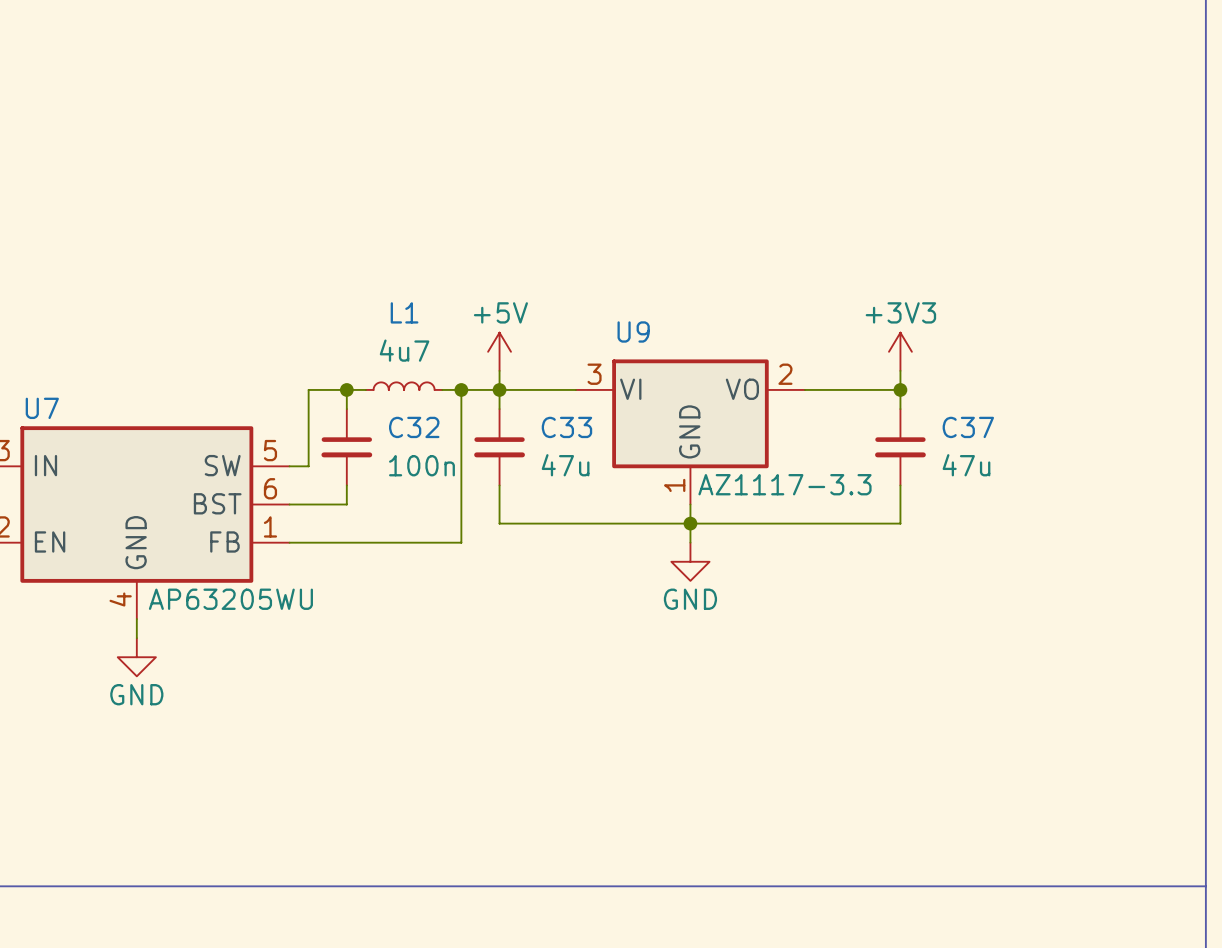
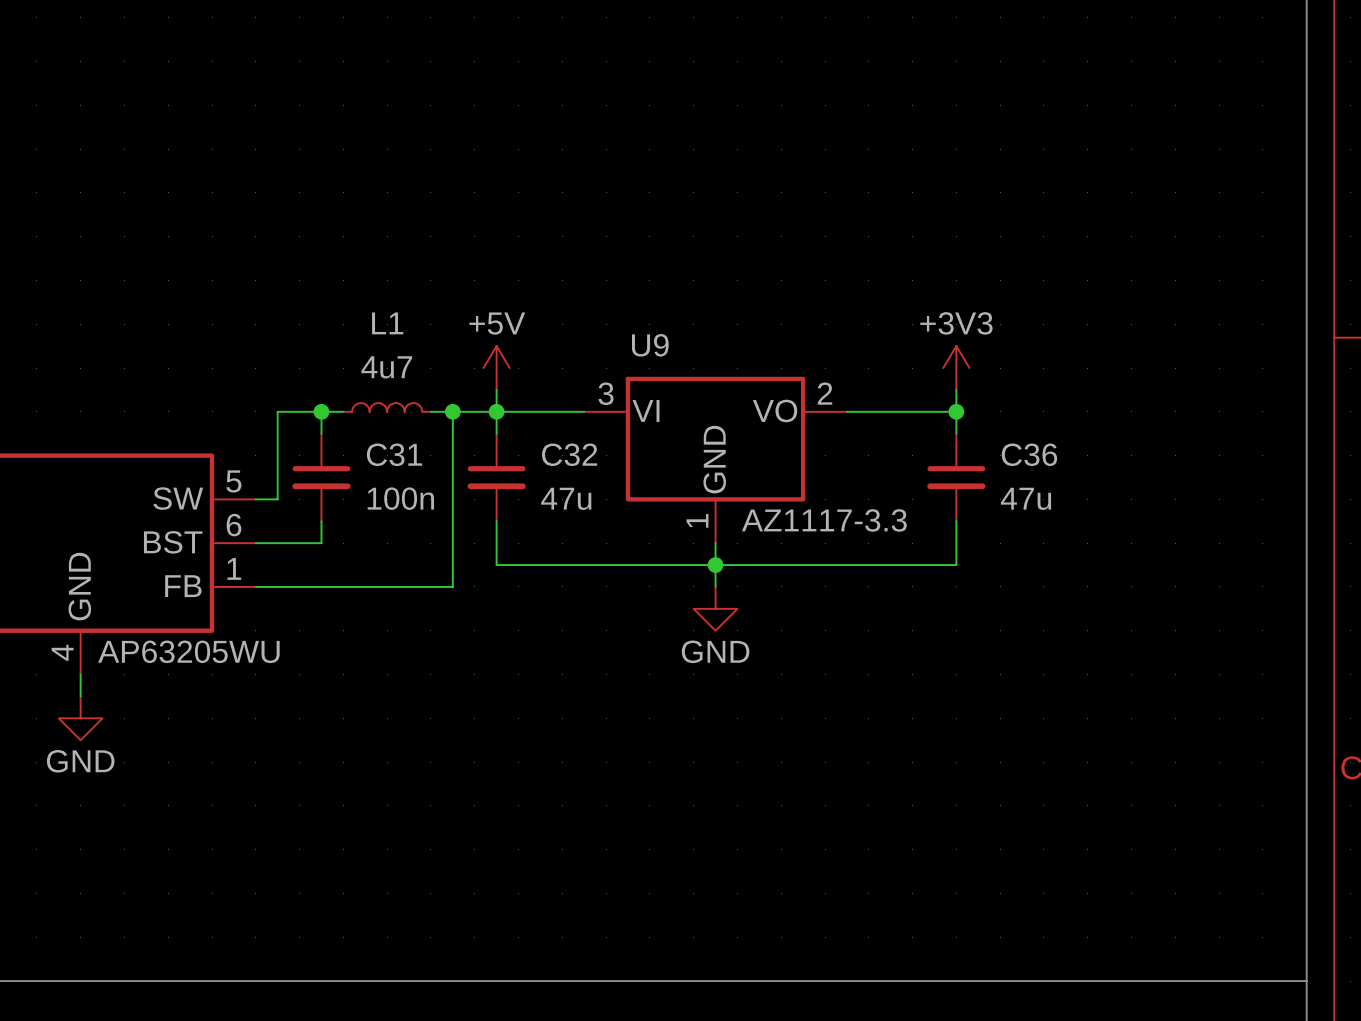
C32 name: C32 (414, 427) -> C31 (394, 454)
C33 name: C33 (566, 427) -> C32 (569, 454)
C37 name: C37 (968, 427) -> C36 (1029, 454)

